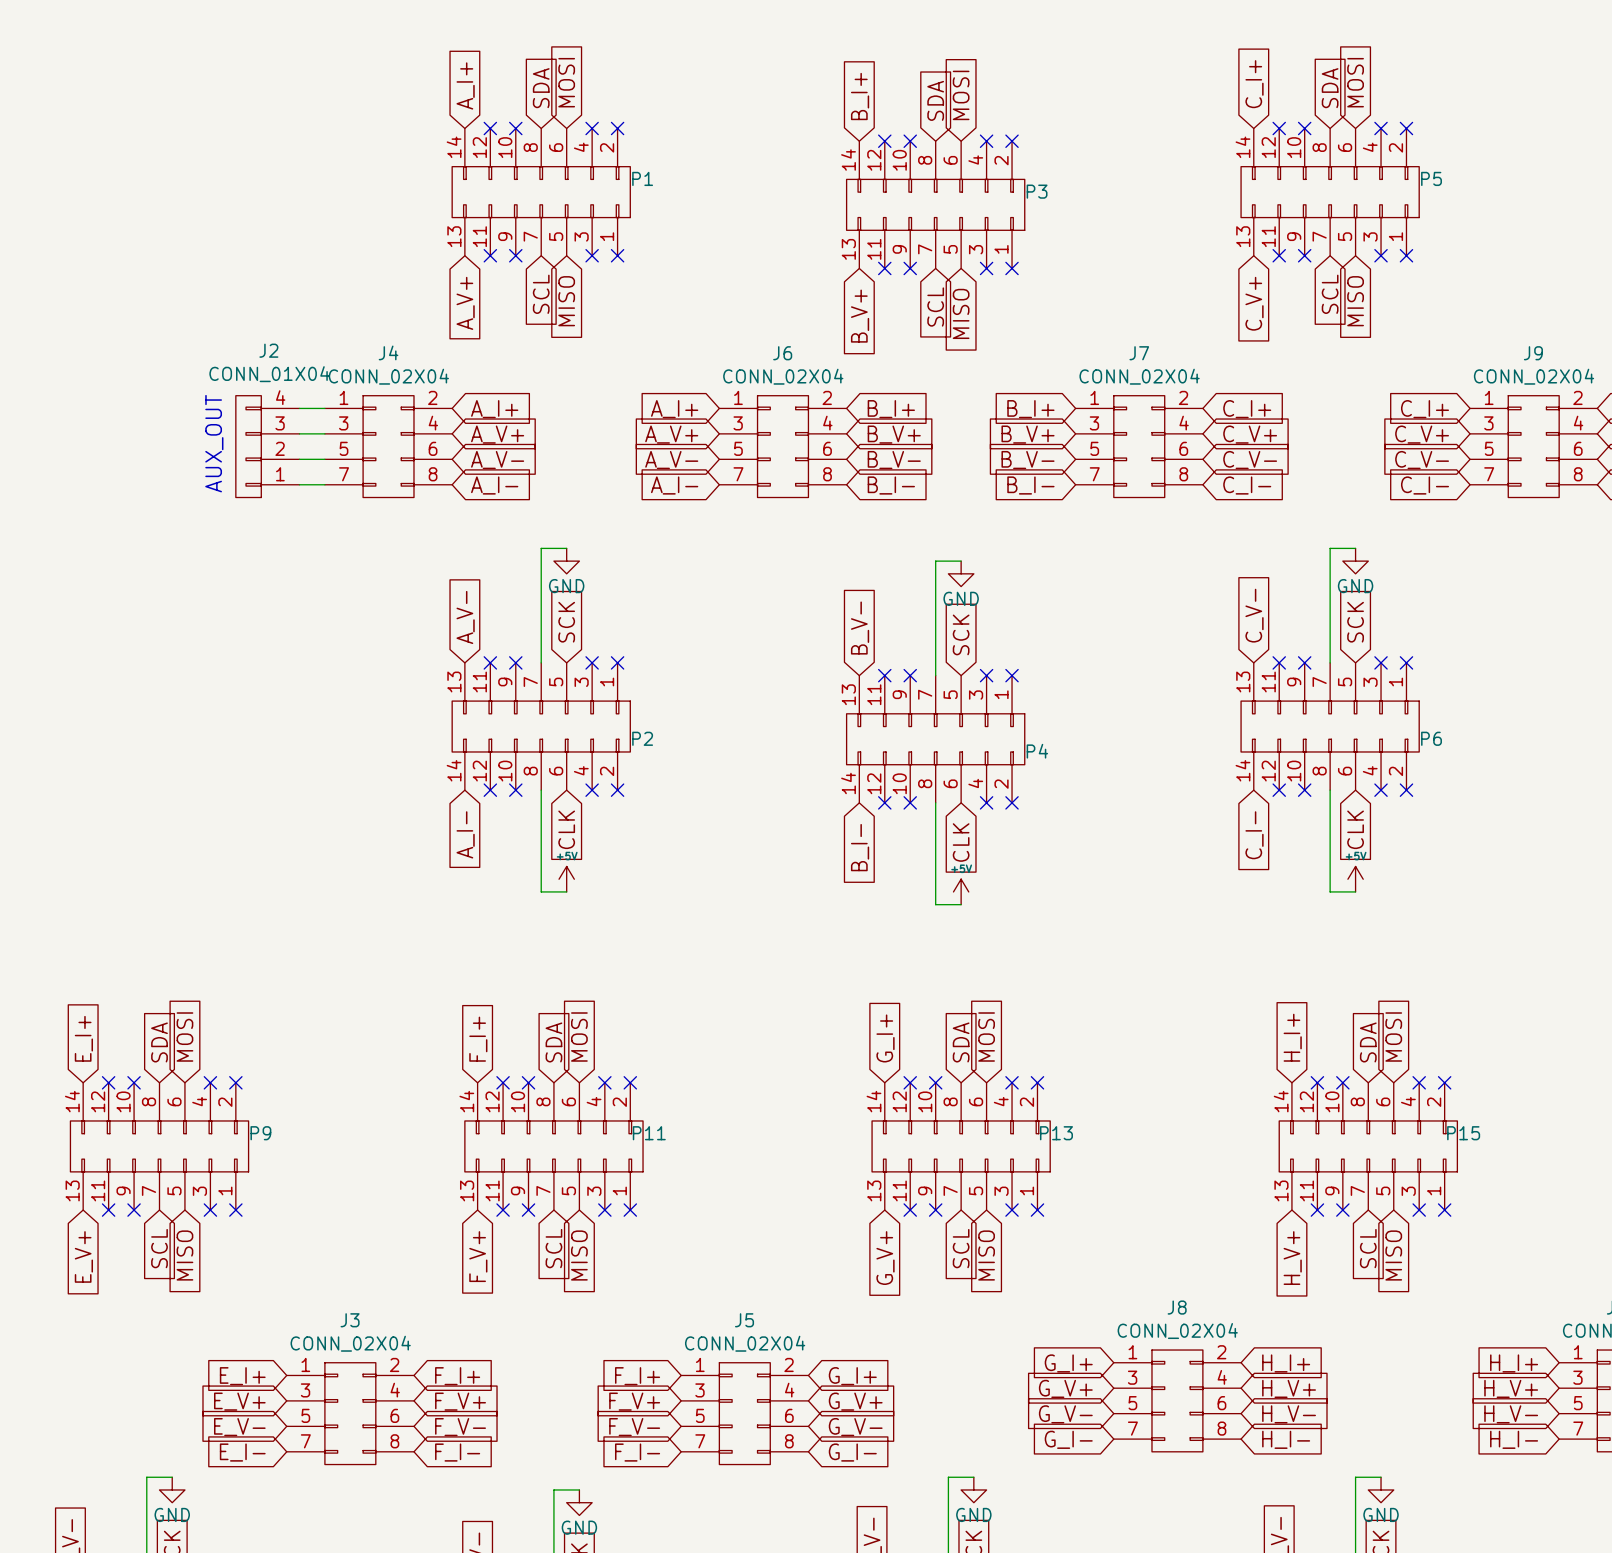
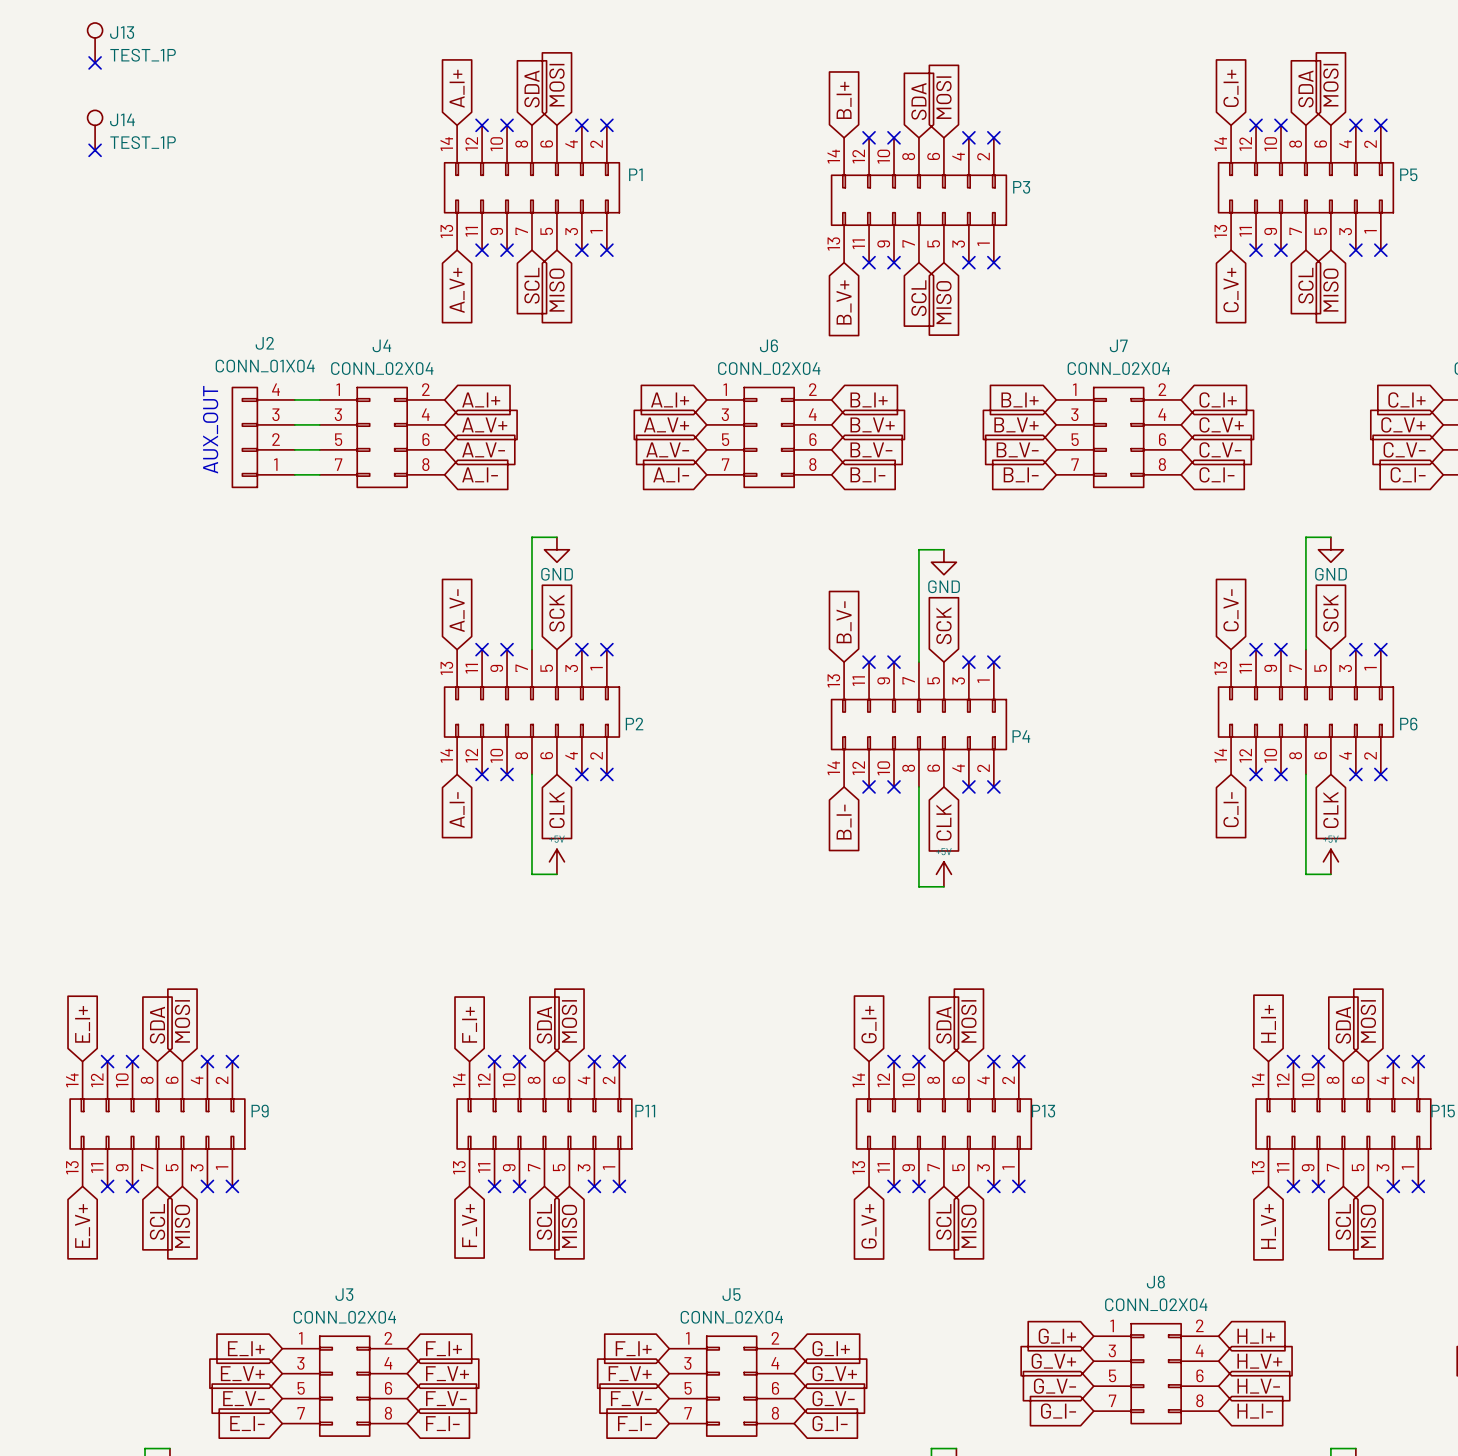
J13: none -> TEST_1P (95, 42)
no-connect mark: none -> (95, 62)
J14: none -> TEST_1P (95, 130)
no-connect mark: none -> (95, 150)

